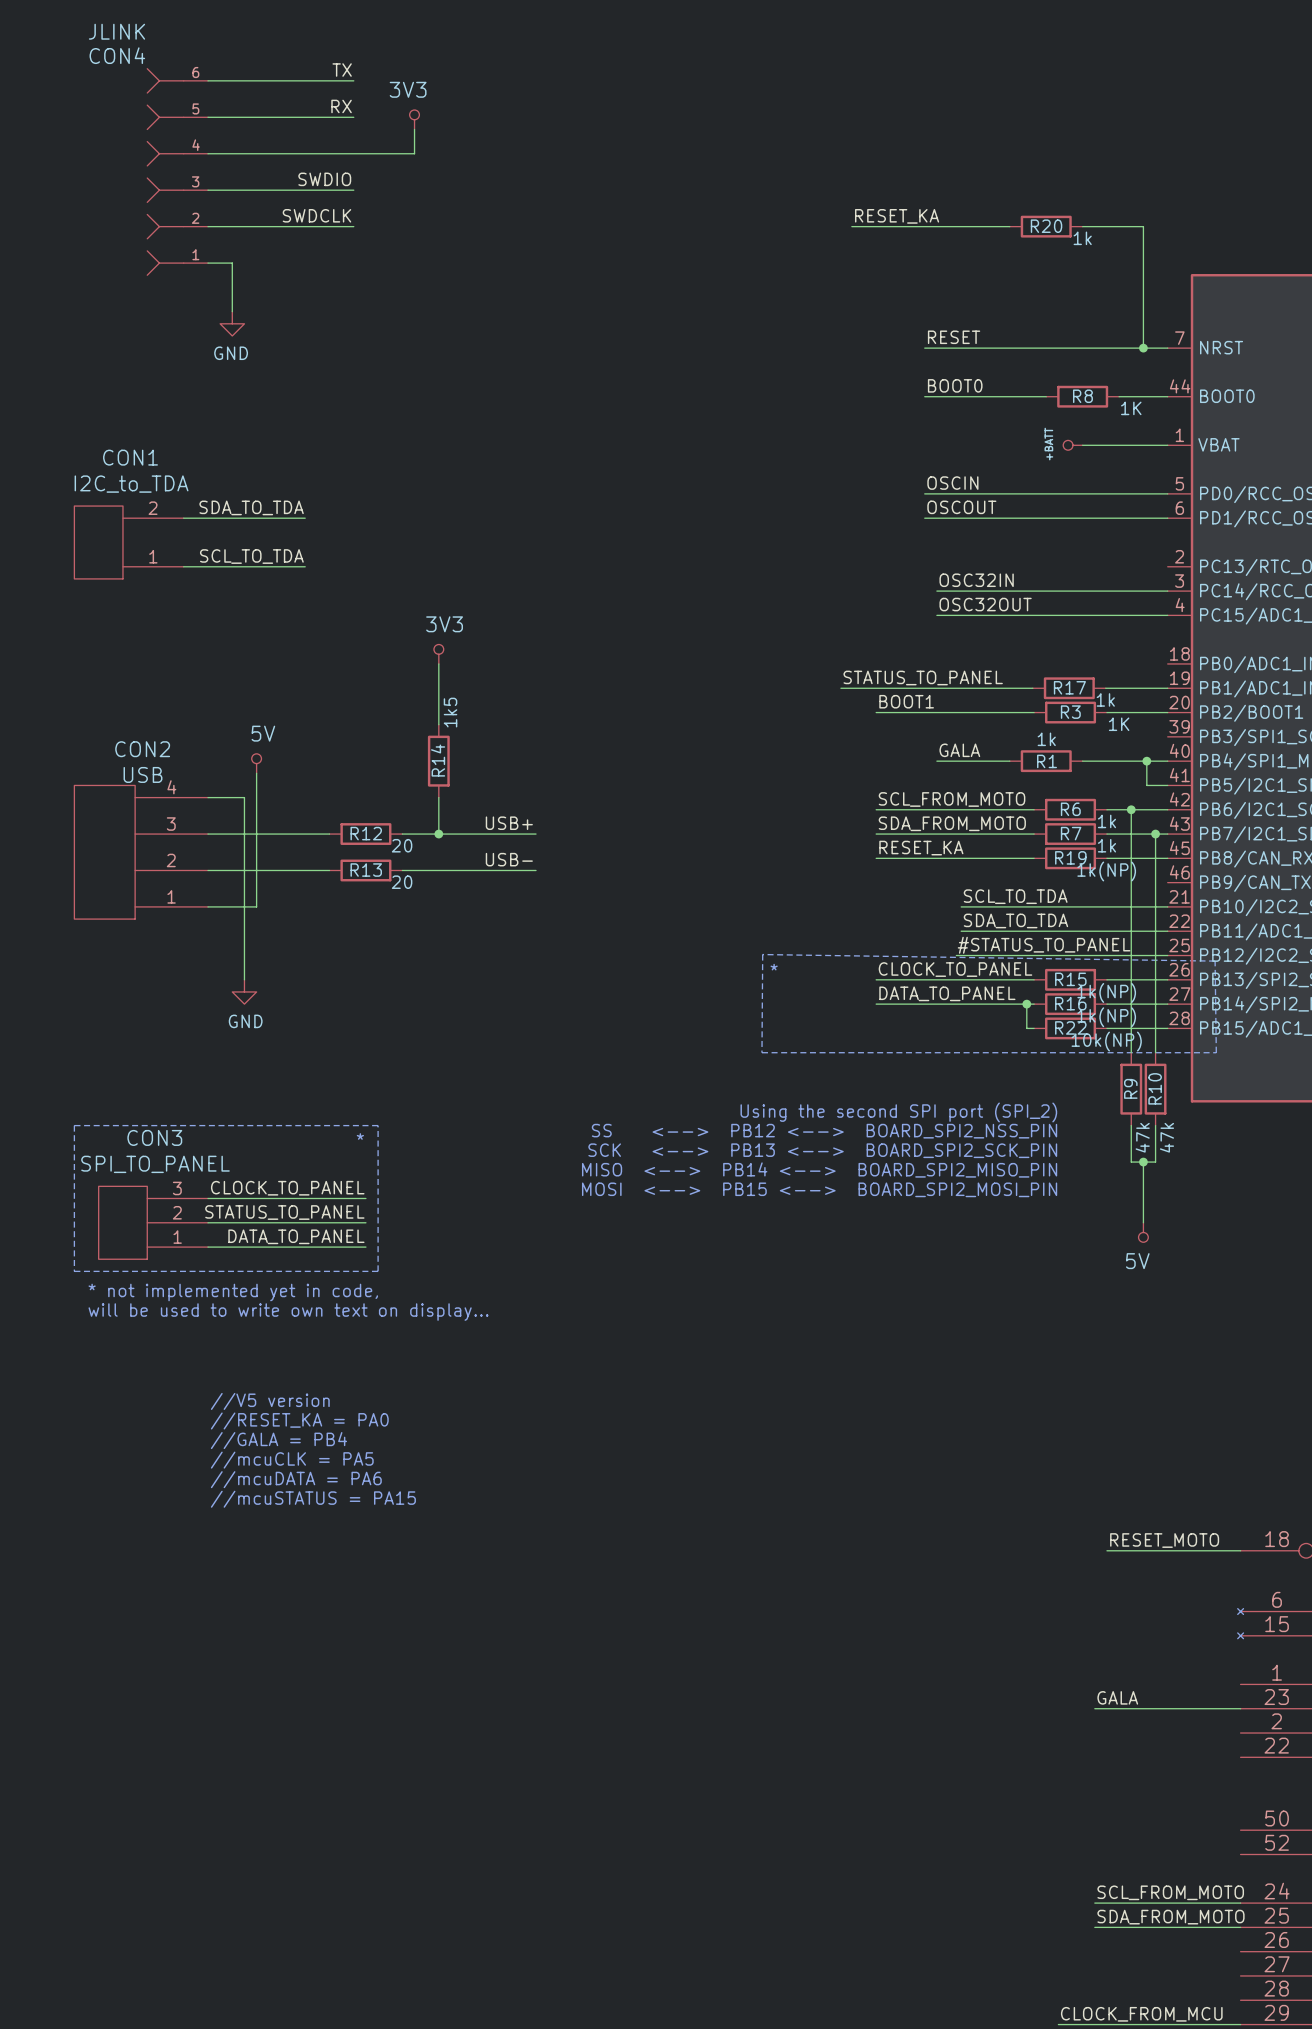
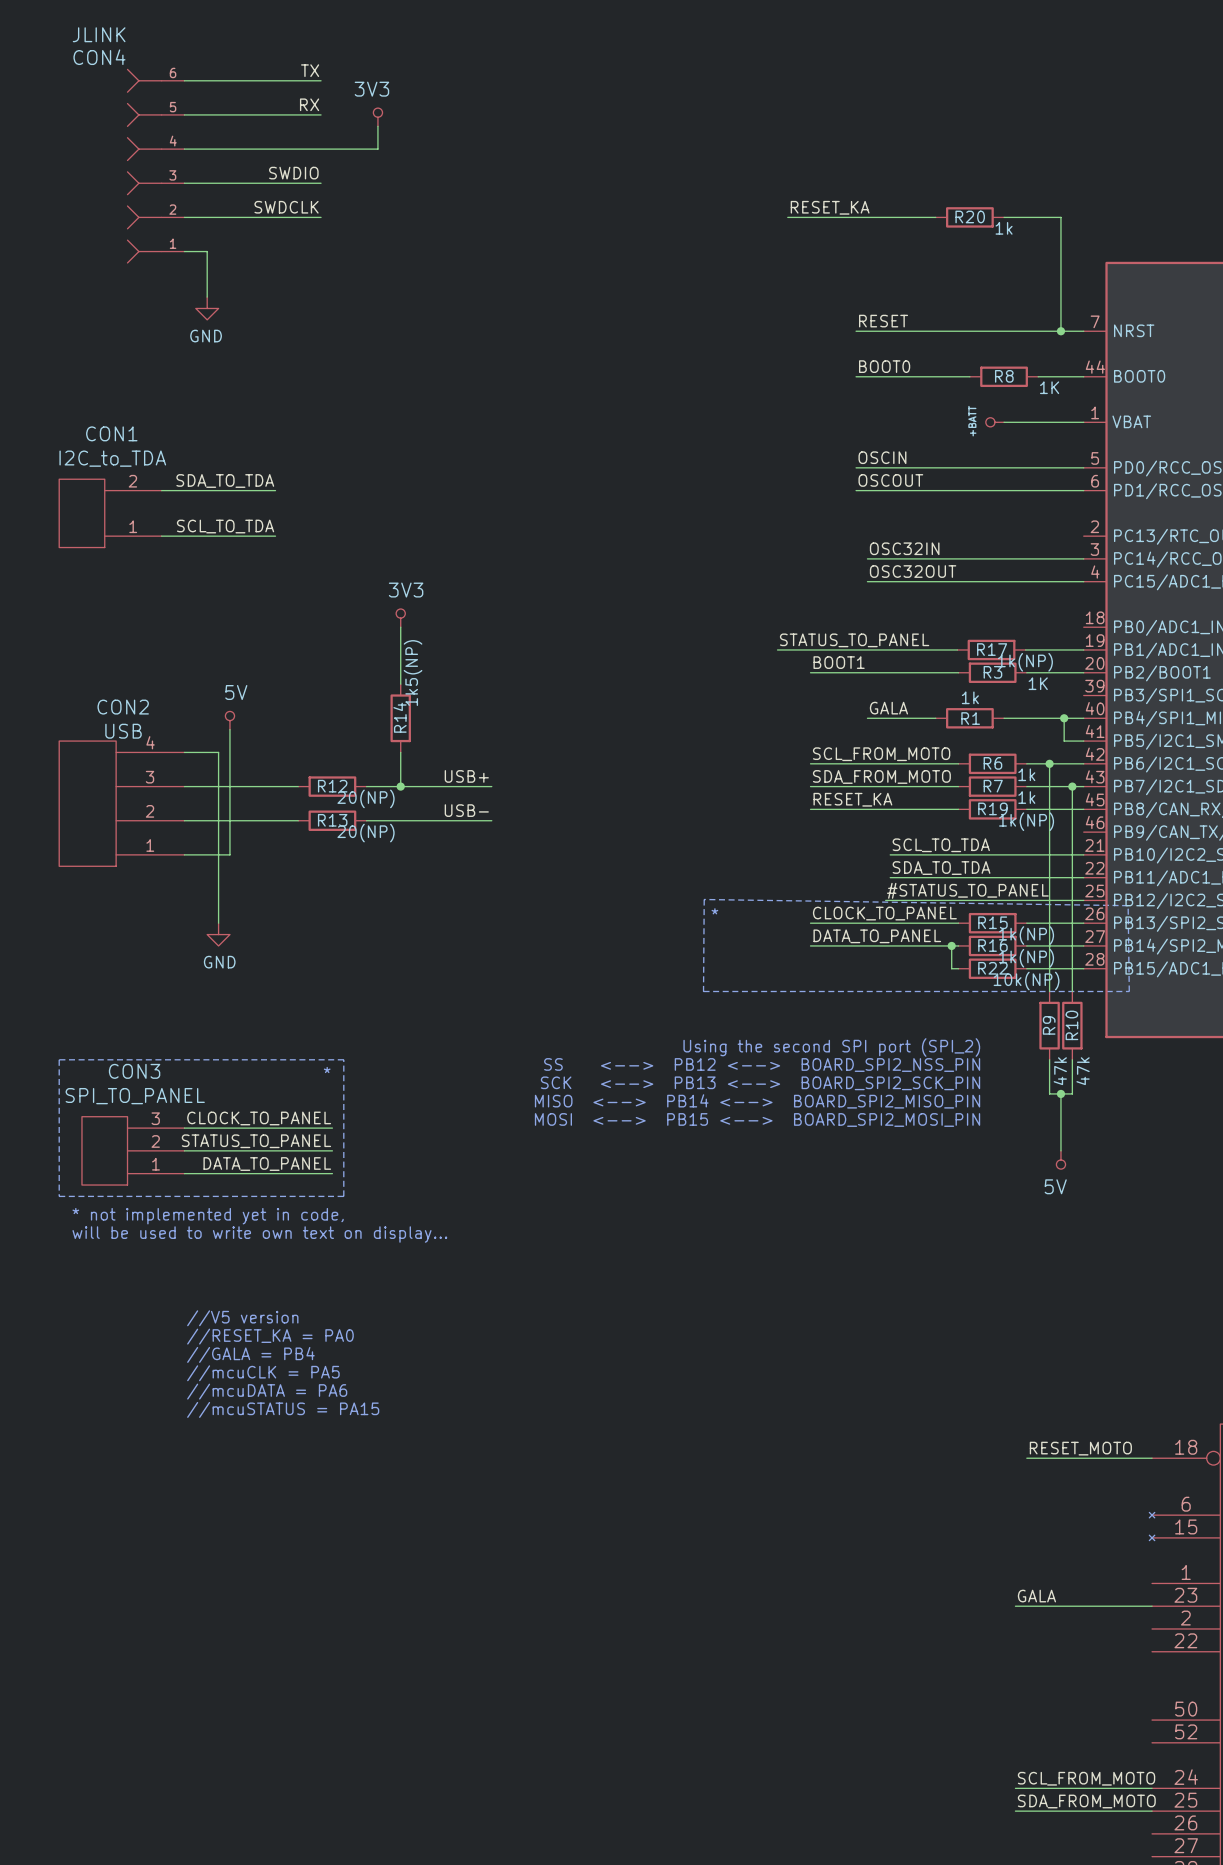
R17 value: 1k (1105, 699) -> 1k(NP) (1025, 662)
R14 value: 1k5 (450, 712) -> 1k5(NP) (413, 673)
R12 value: 20 (402, 845) -> 20(NP) (366, 798)
R13 value: 20 (402, 882) -> 20(NP) (366, 833)

